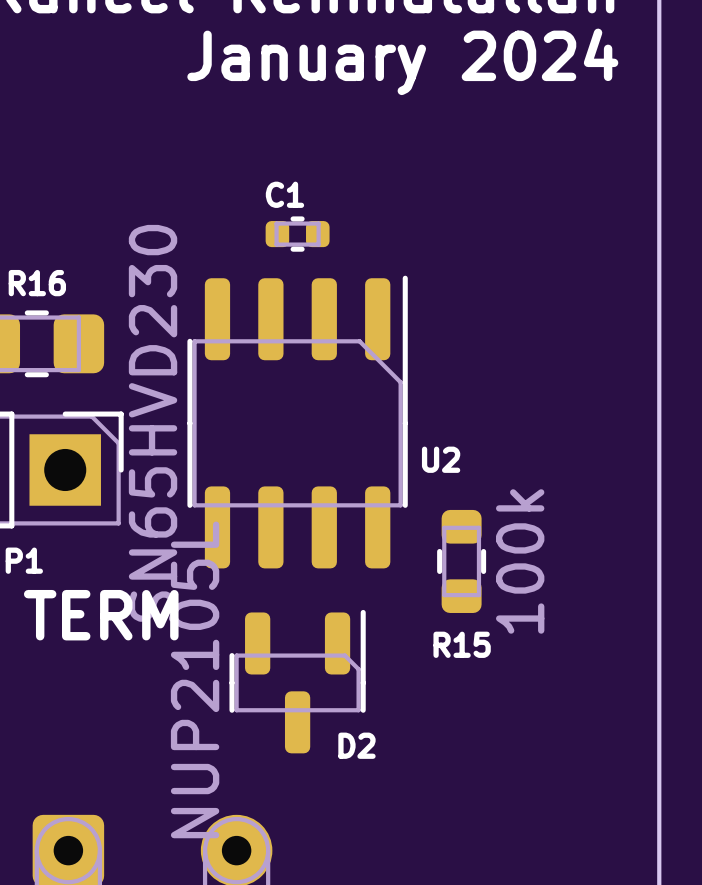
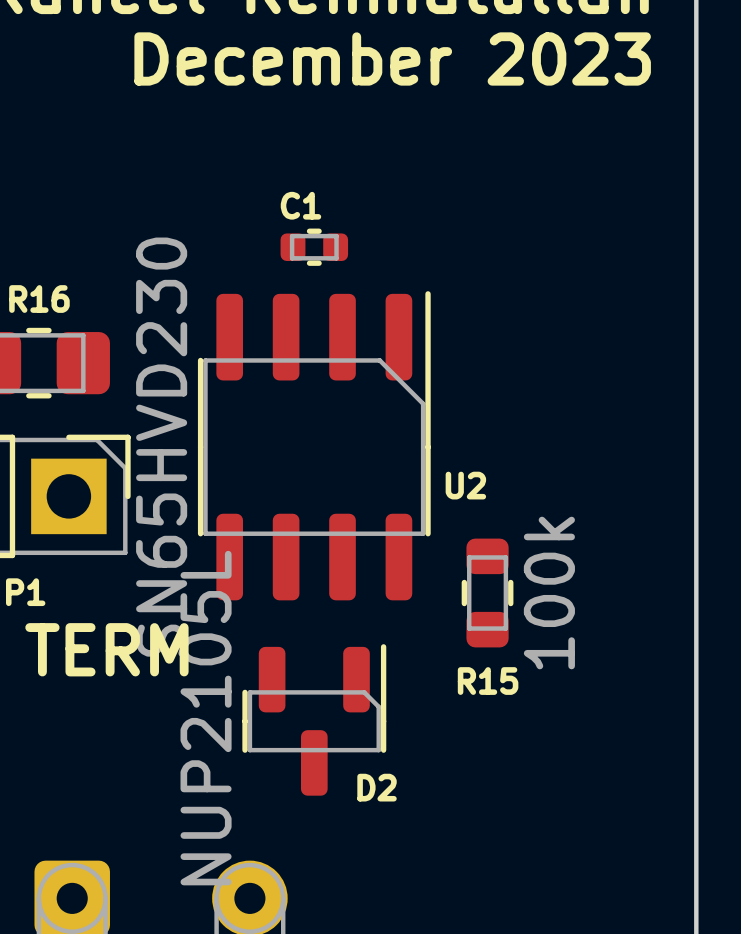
text: January 2024 (402, 61) -> December 2023 (392, 58)

